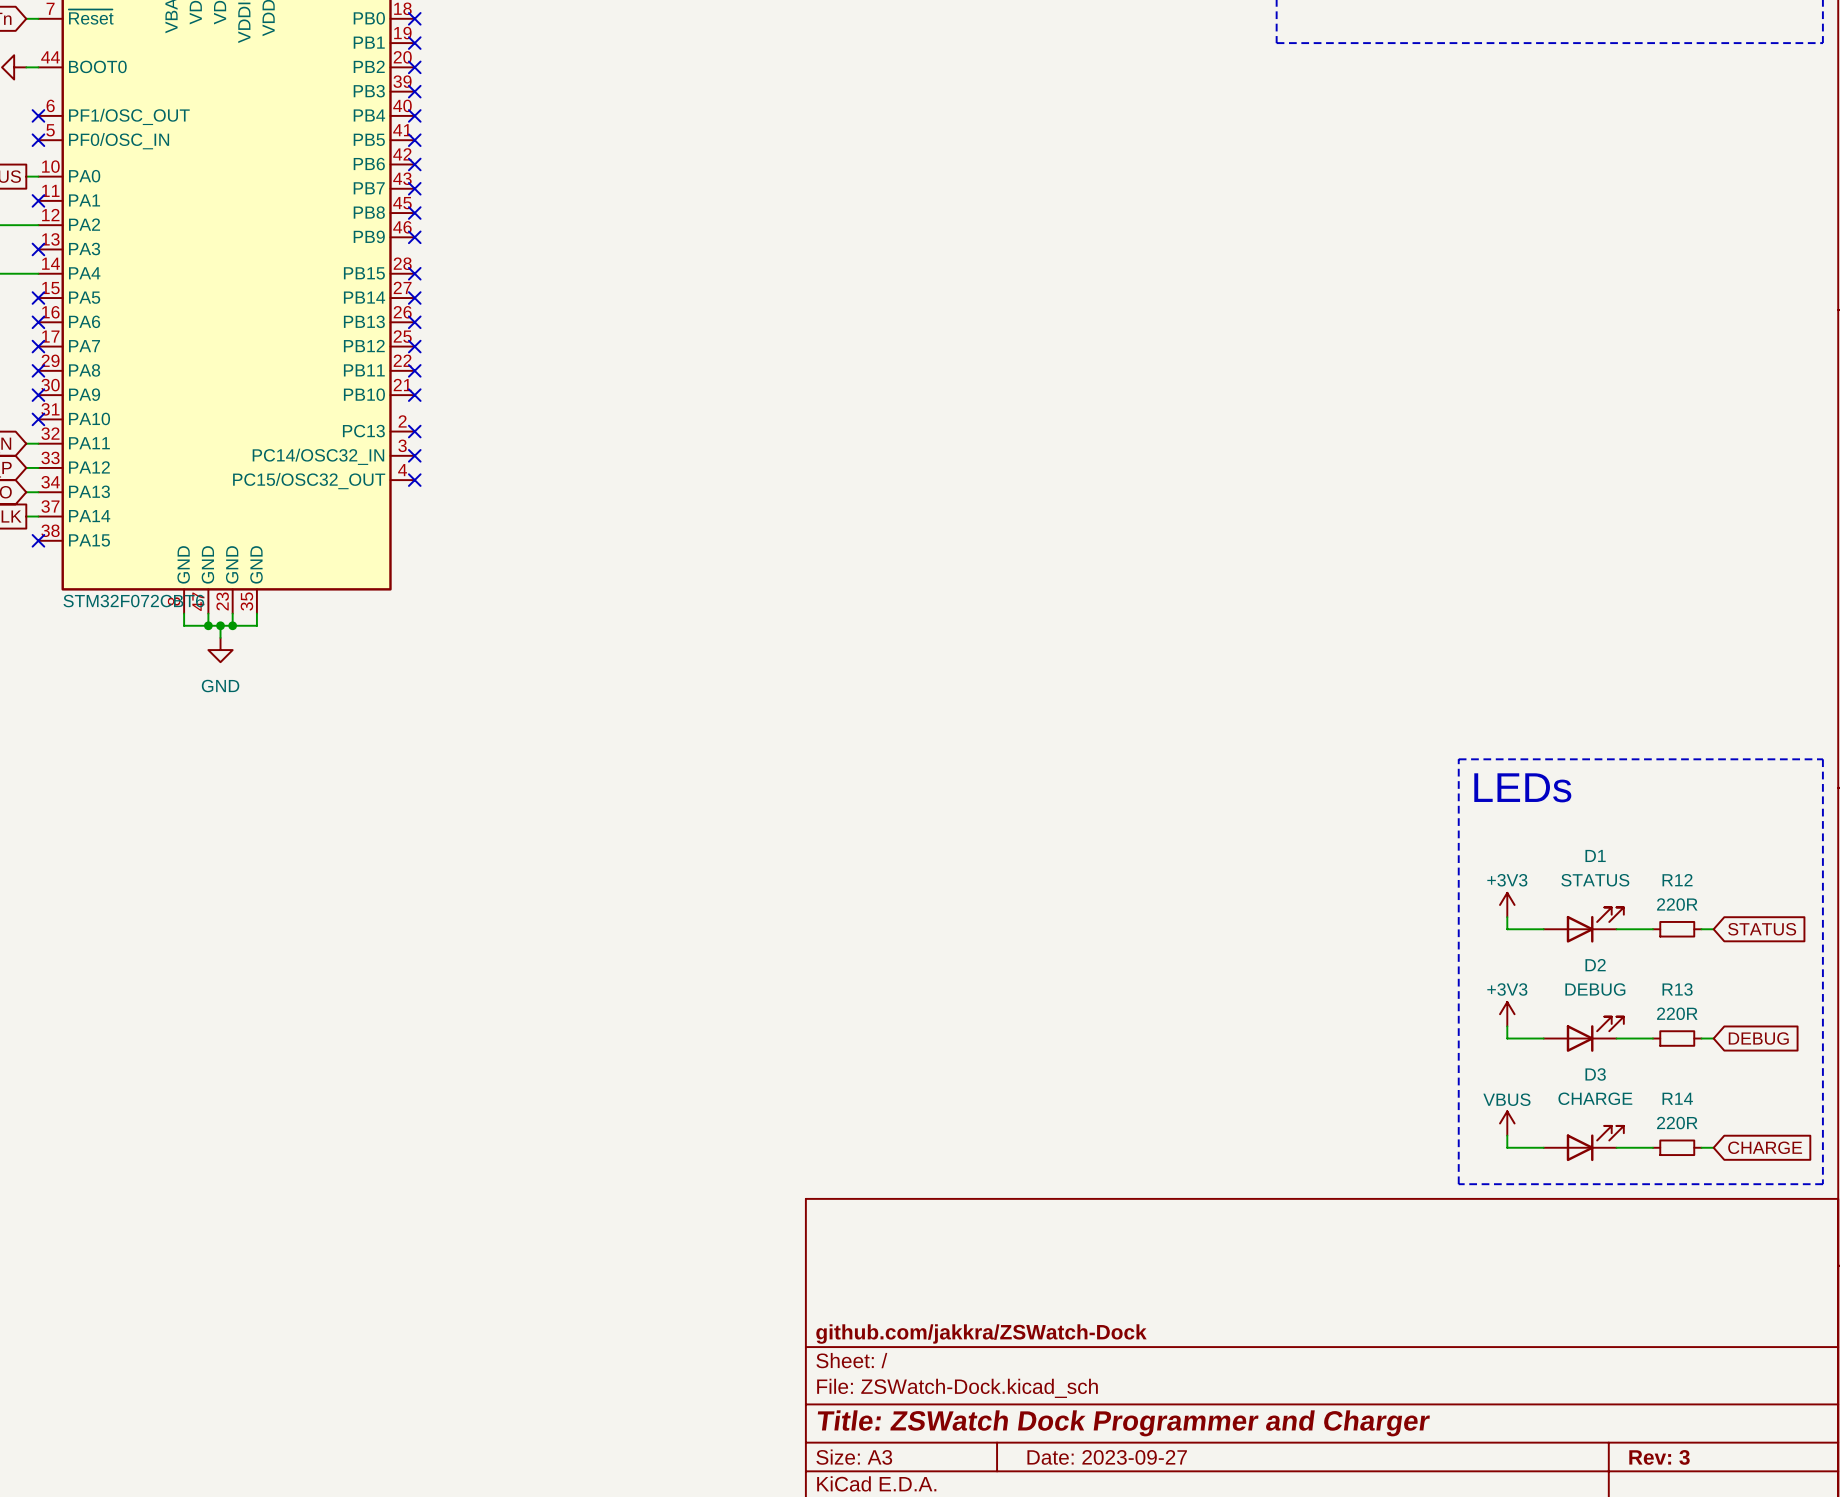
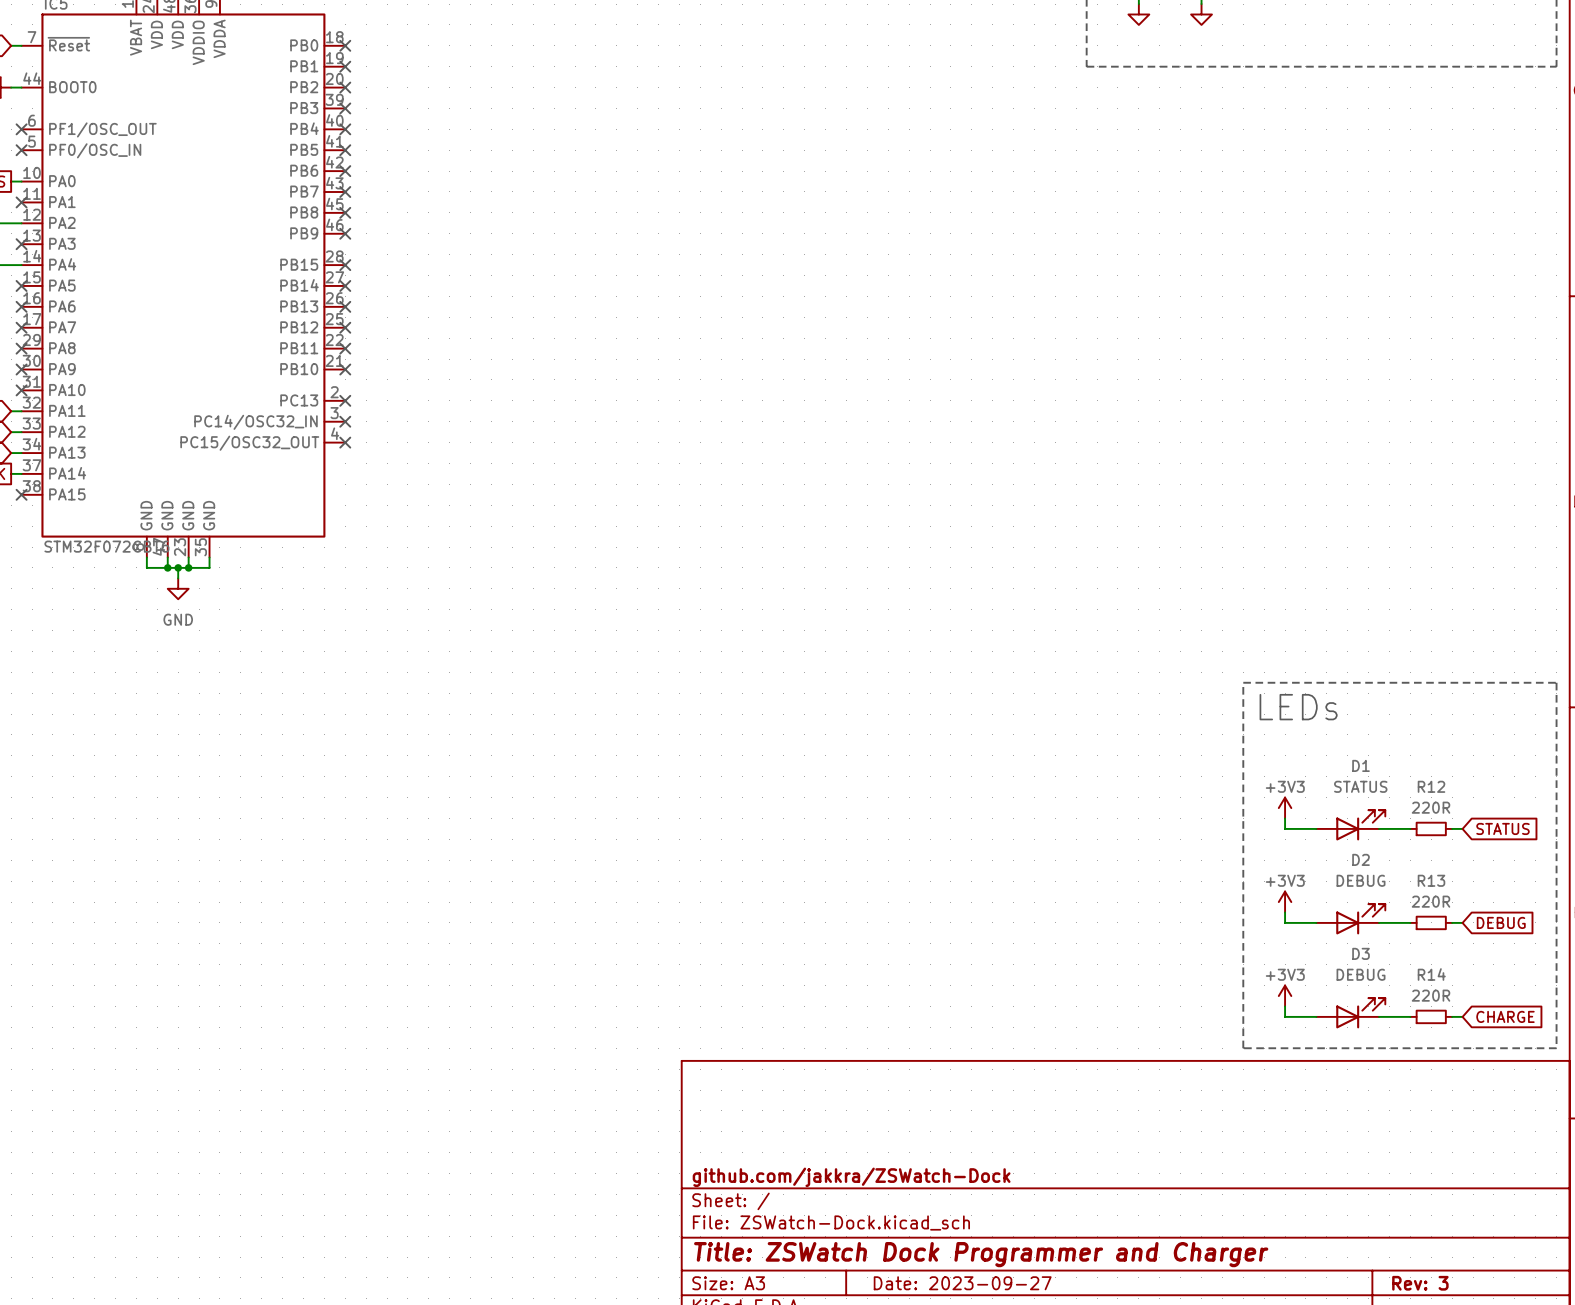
D3 value: CHARGE (1595, 1098) -> DEBUG (1361, 974)
power symbol: VBUS (1507, 1123) -> +3V3 (1285, 996)

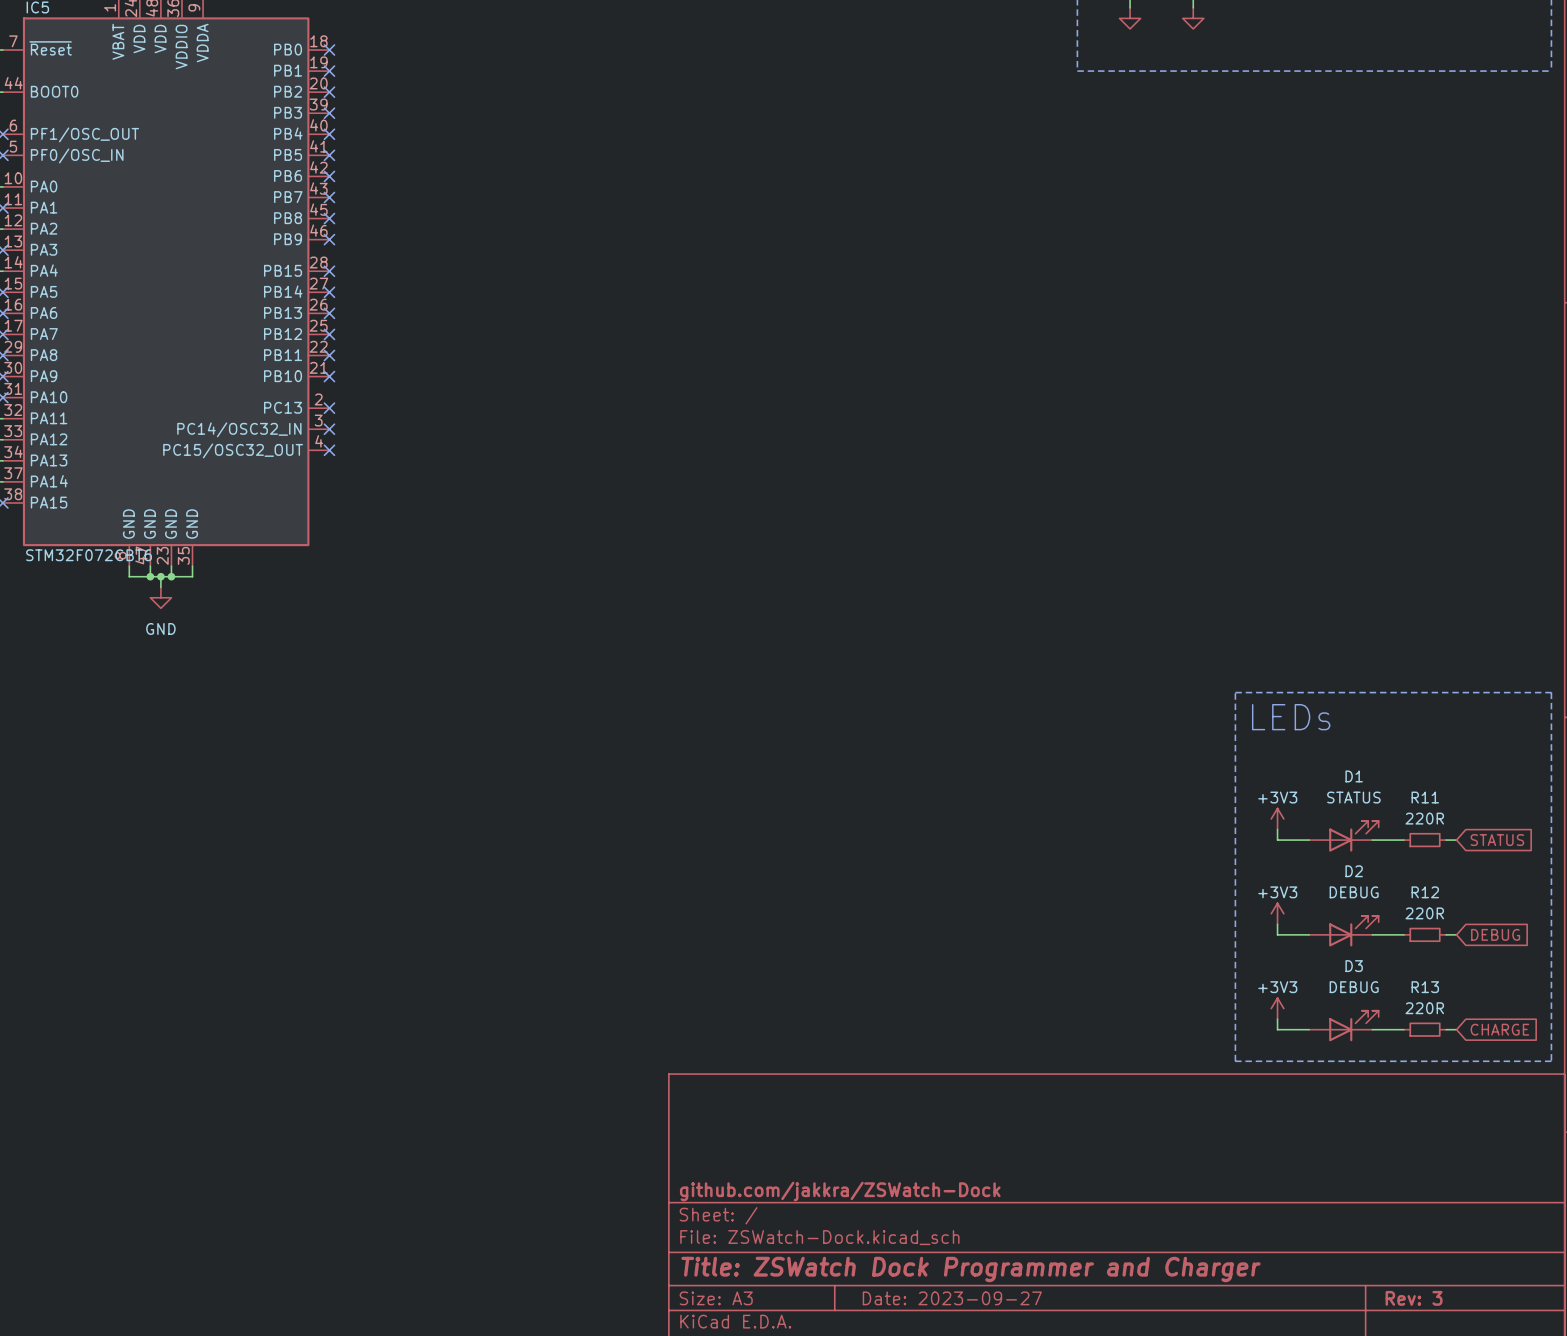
R12 name: R12 (1431, 786) -> R11 (1425, 797)
R13 name: R13 (1431, 880) -> R12 (1425, 892)
R14 name: R14 (1431, 974) -> R13 (1425, 987)

